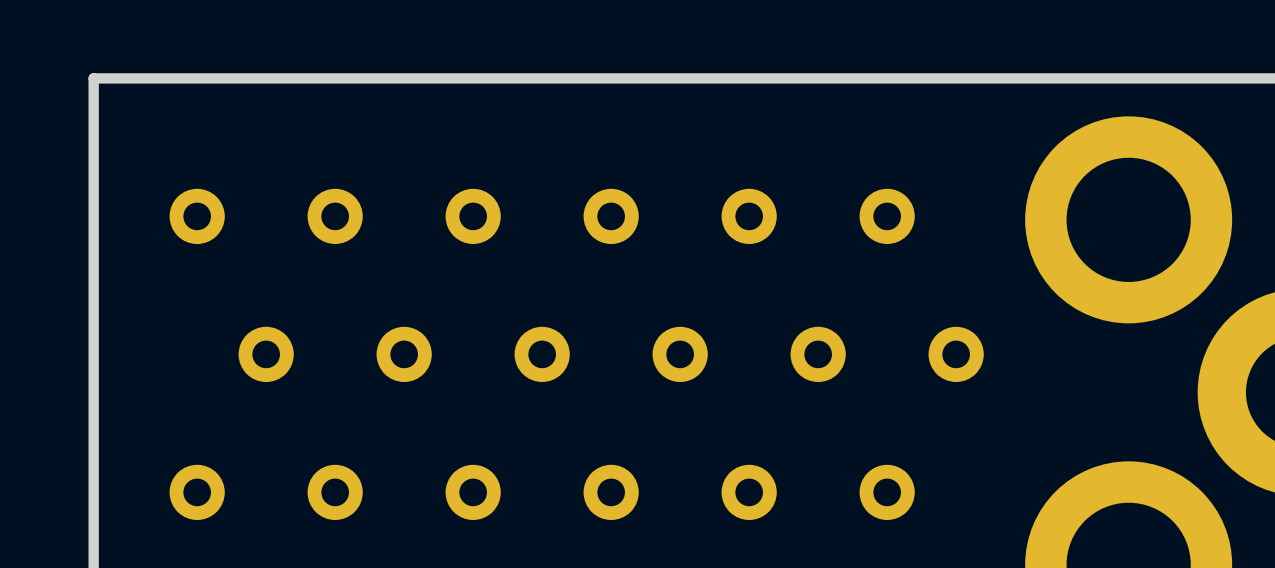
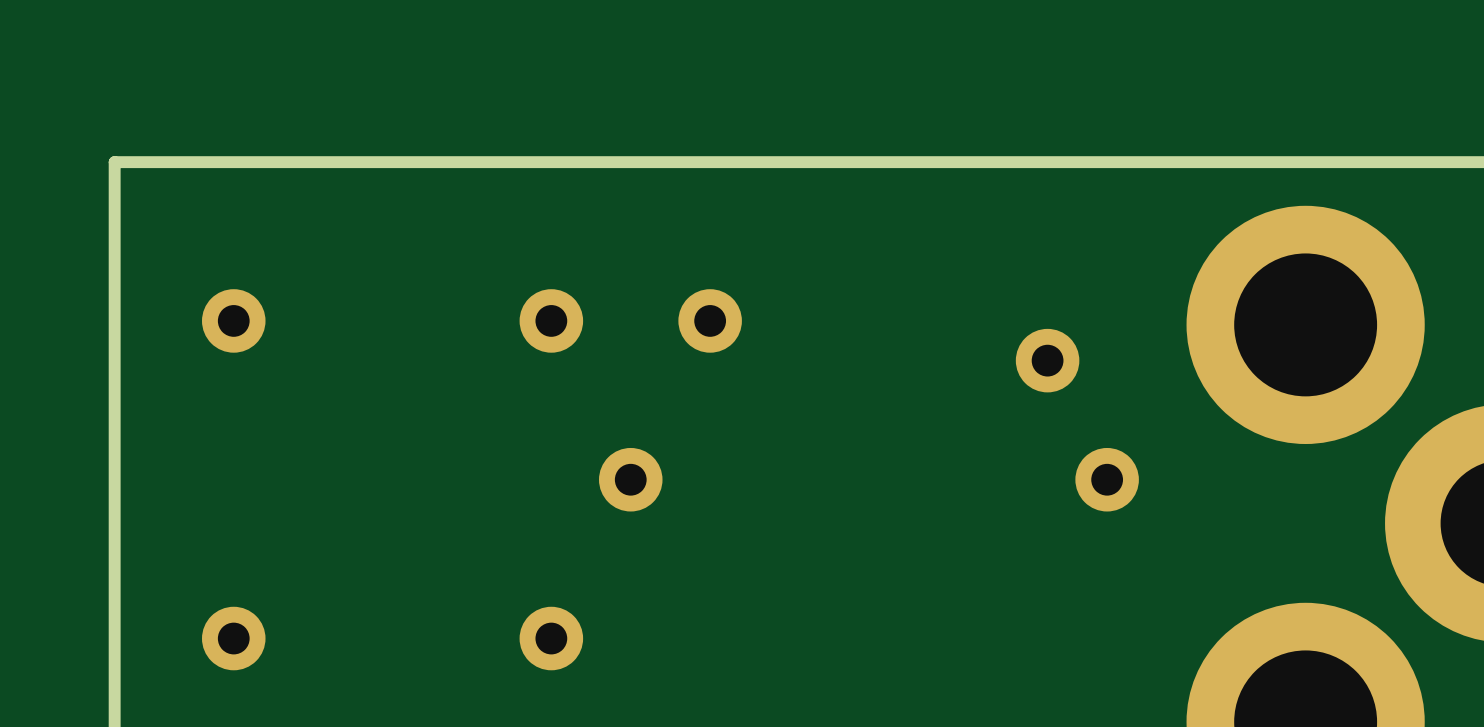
part: (335, 216) -> none
part: (749, 216) -> none
part position: (887, 216) -> (1047, 360)
part: (266, 354) -> none
part: (404, 354) -> none
part: (680, 354) -> none
part: (818, 354) -> none
part: (335, 492) -> none
part: (611, 492) -> none
part: (749, 492) -> none
part: (887, 492) -> none

